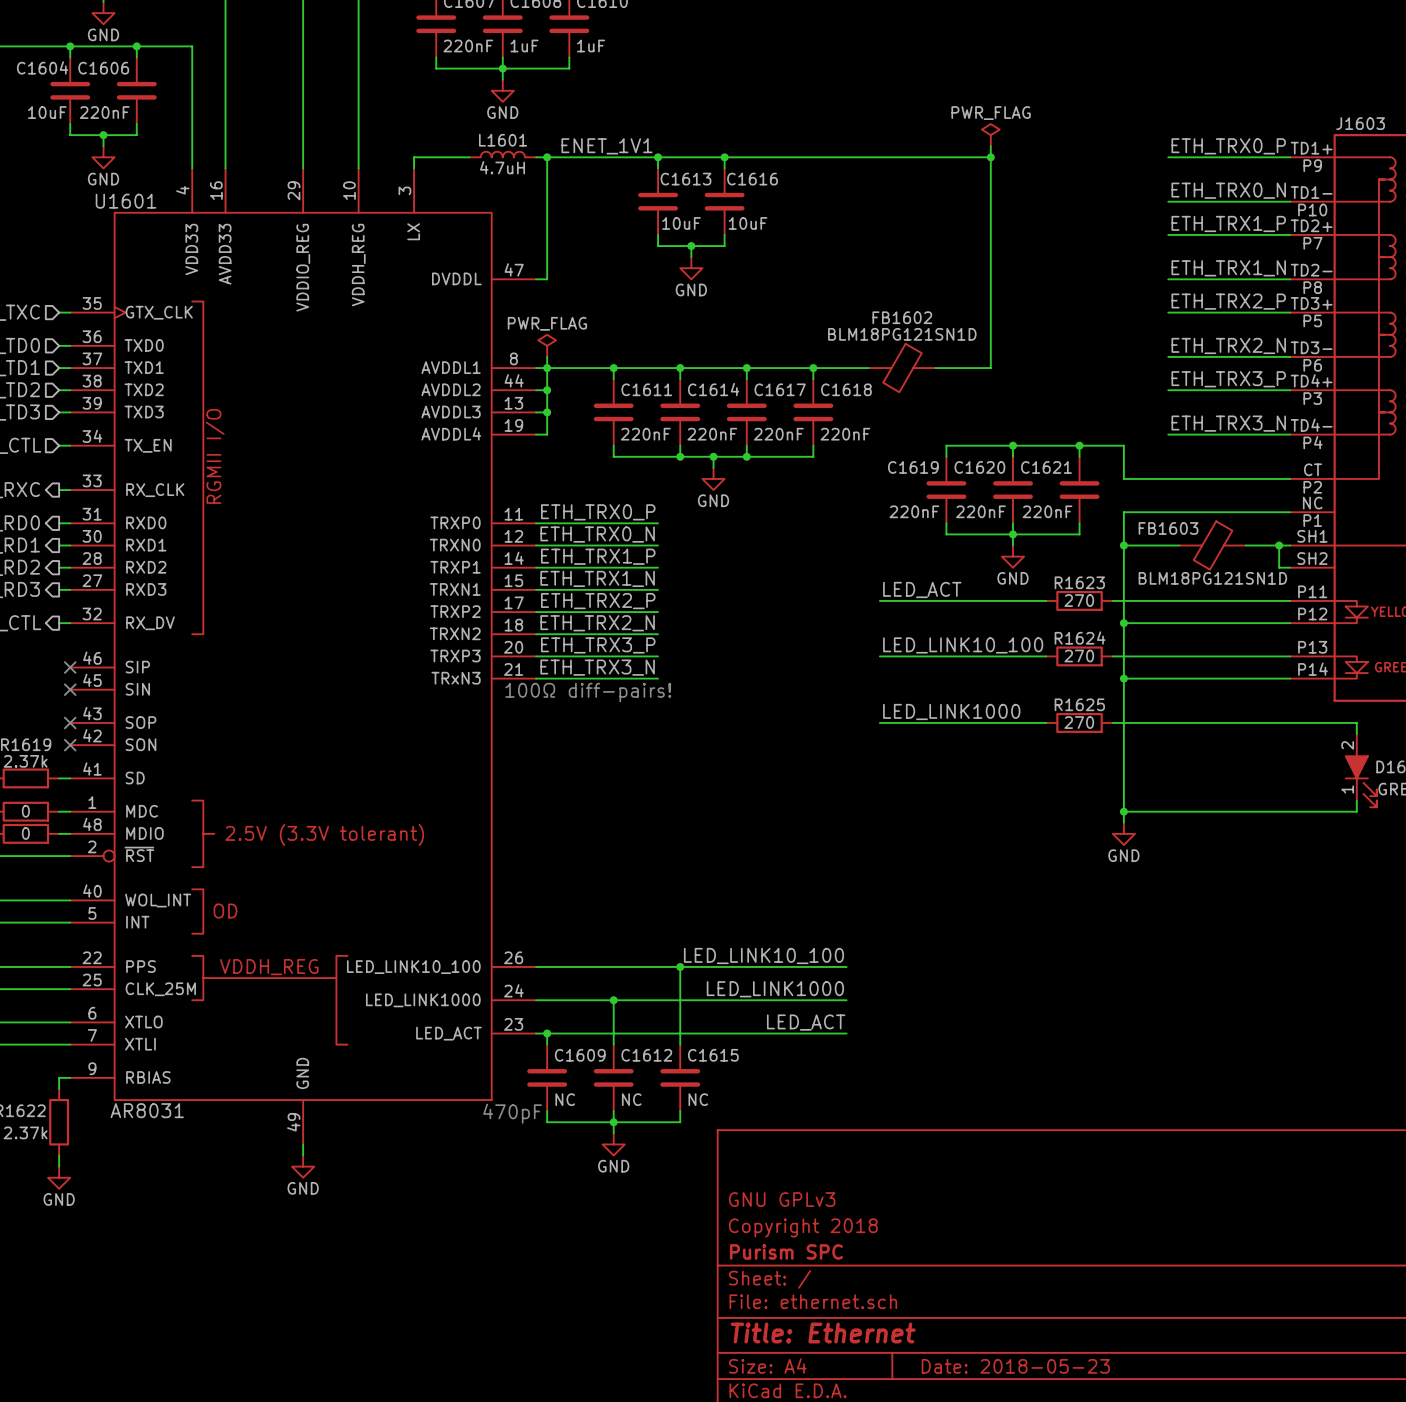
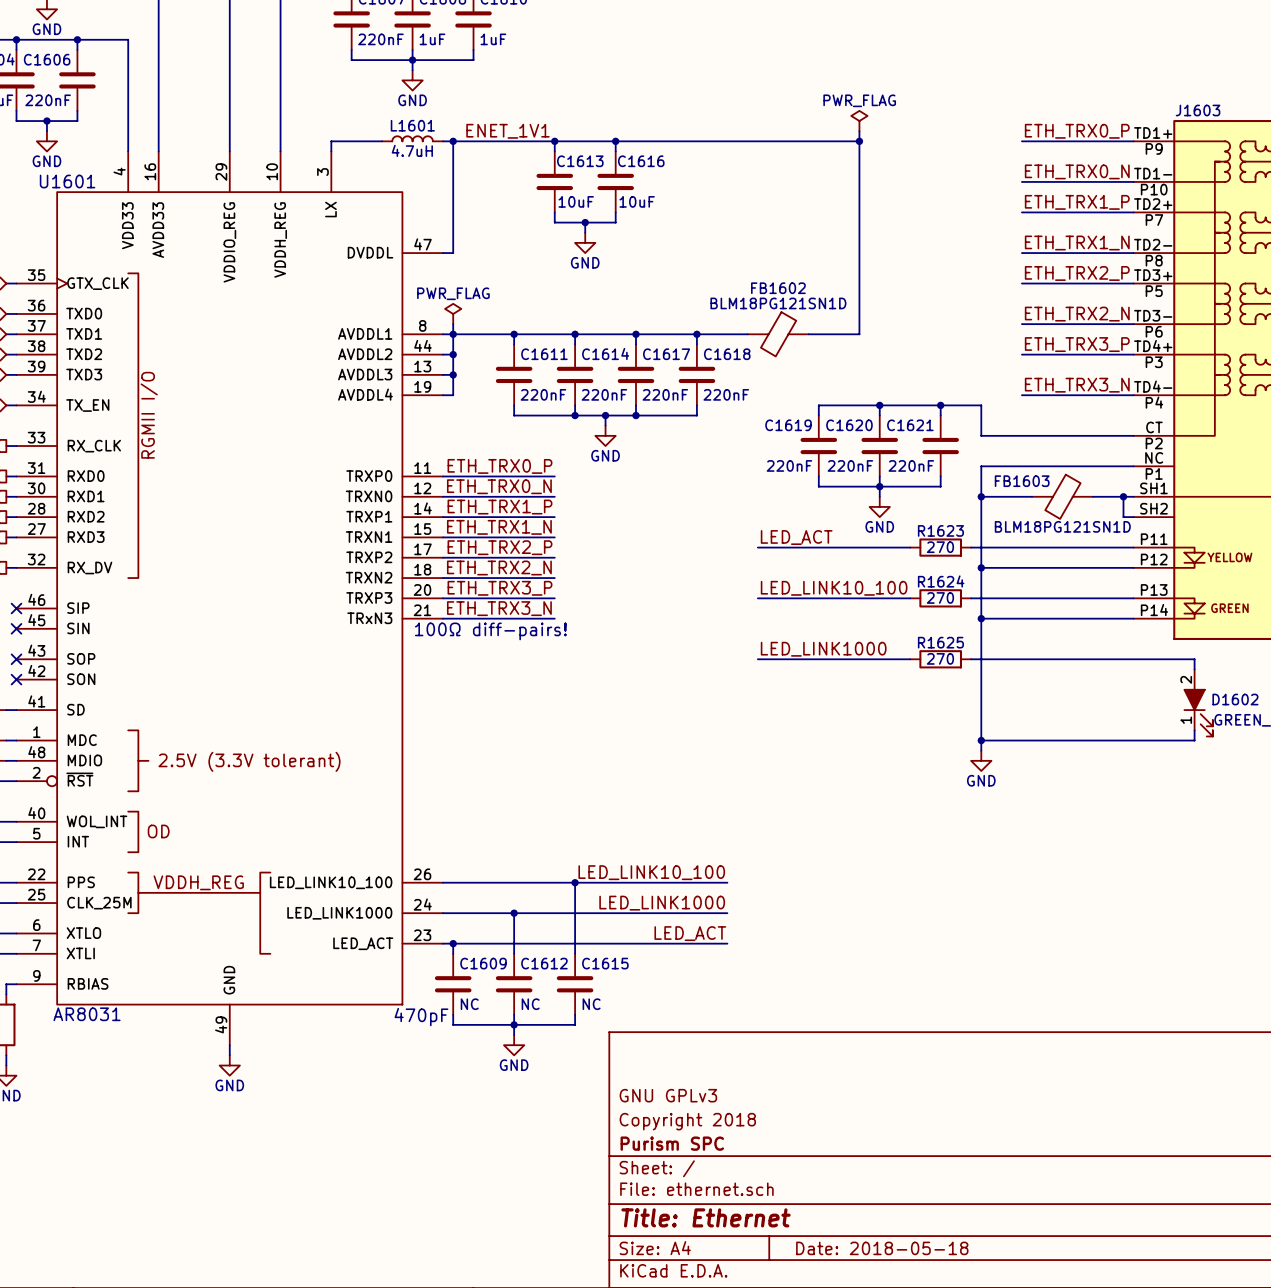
title block: Date: 2018-05-23 (1015, 1366) -> Date: 2018-05-18 (882, 1248)

